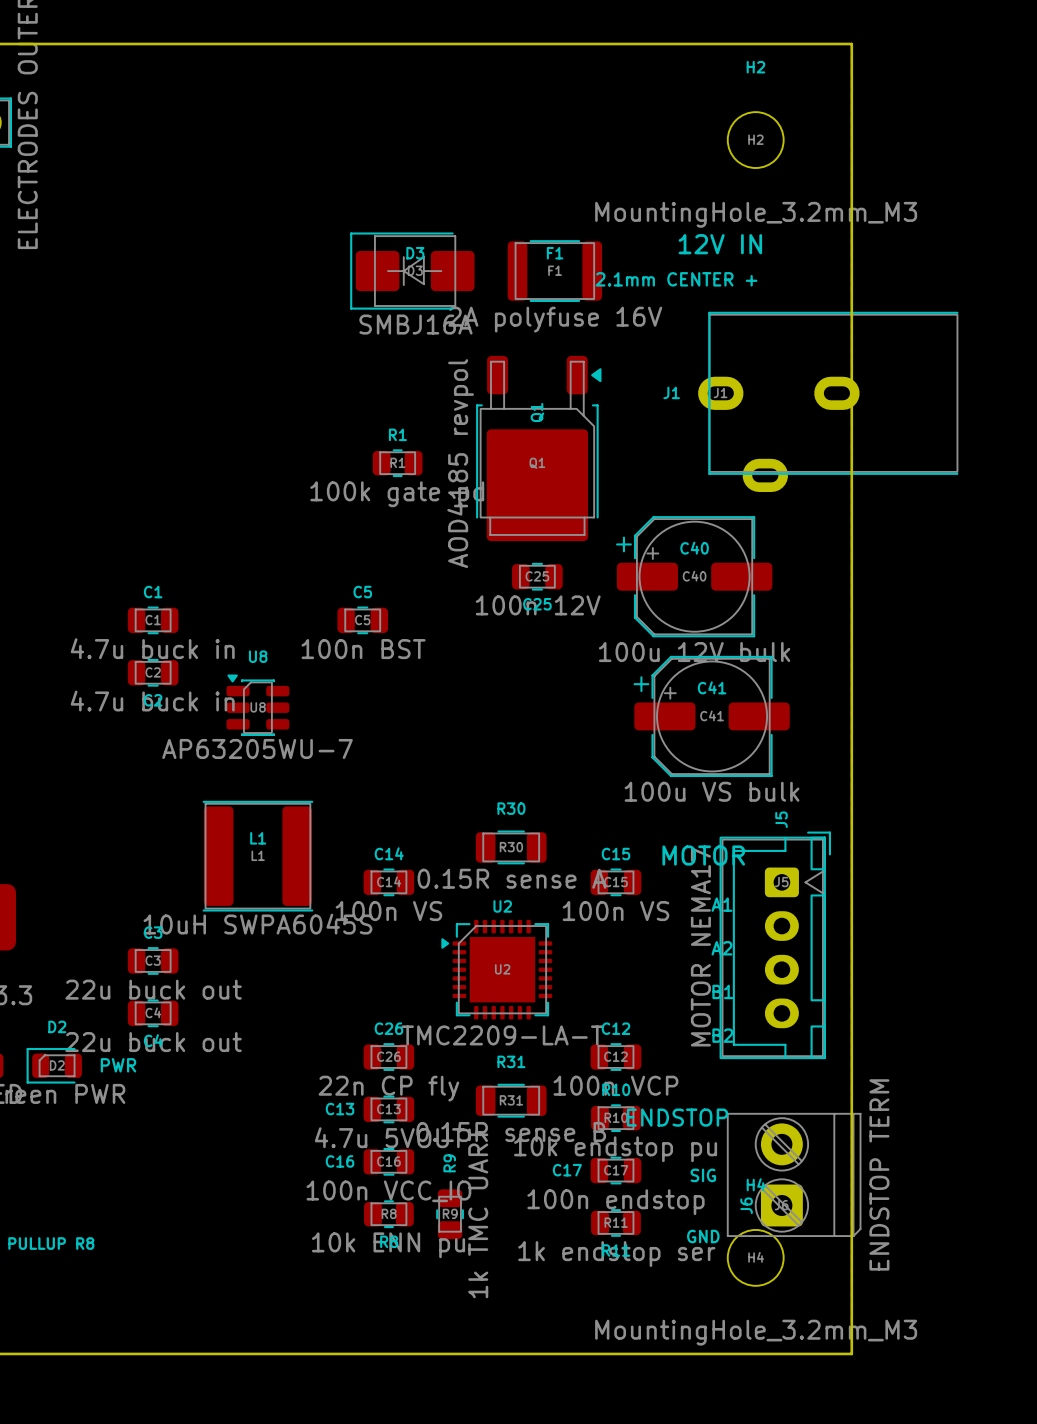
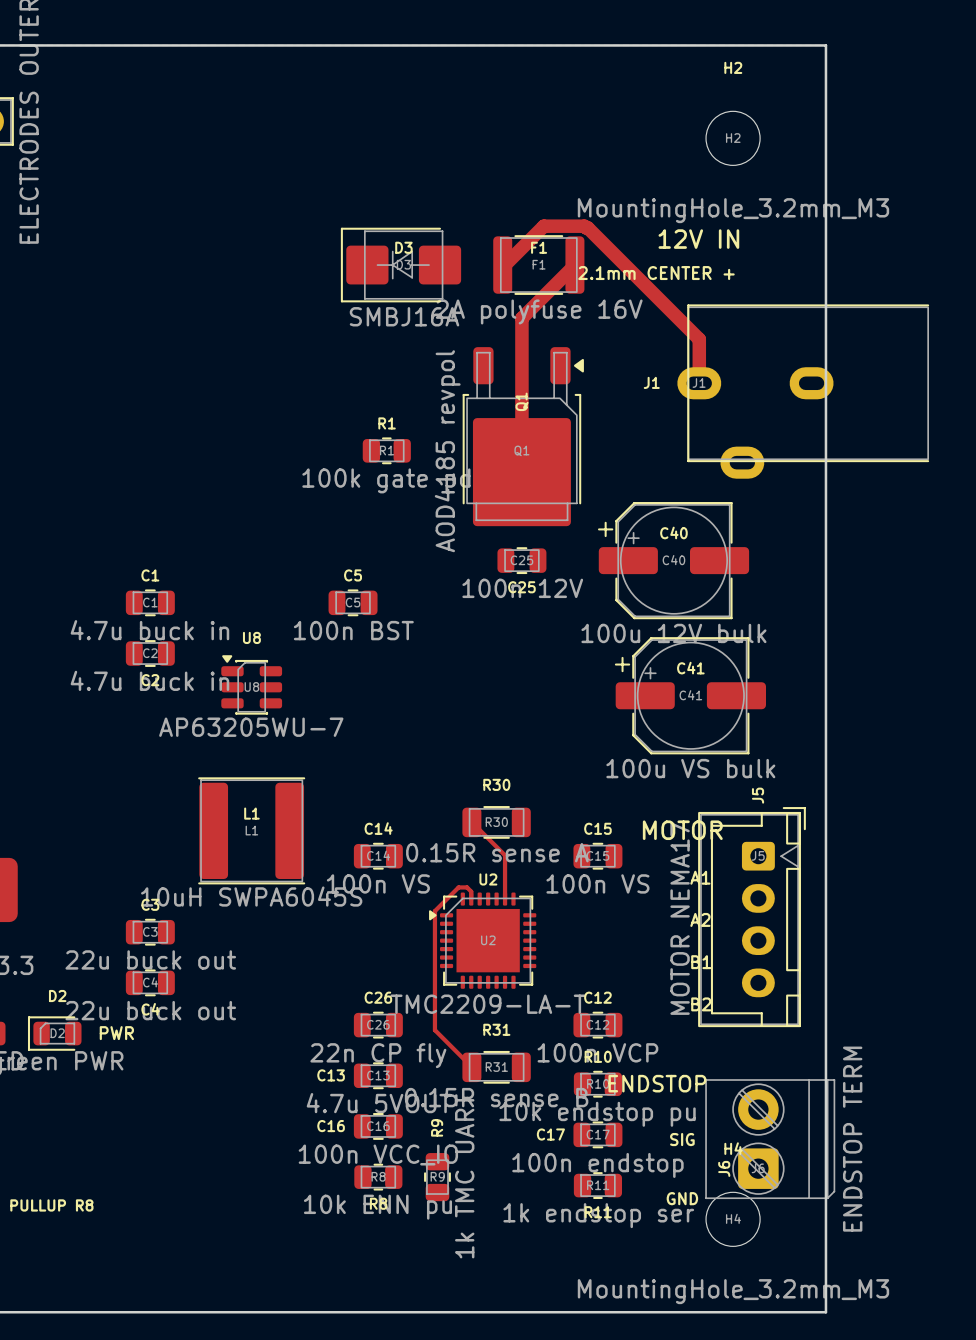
top track: none -> (502, 265) (505, 265) (543, 226) (584, 226) (587, 227) (699, 339) (699, 383)
top track: none -> (575, 265) (521, 318) (521, 471)
top track: none -> (472, 822) (505, 855) (505, 899)
top track: none -> (471, 899) (471, 891) (467, 887) (458, 887) (434, 911) (434, 1030) (472, 1067)

